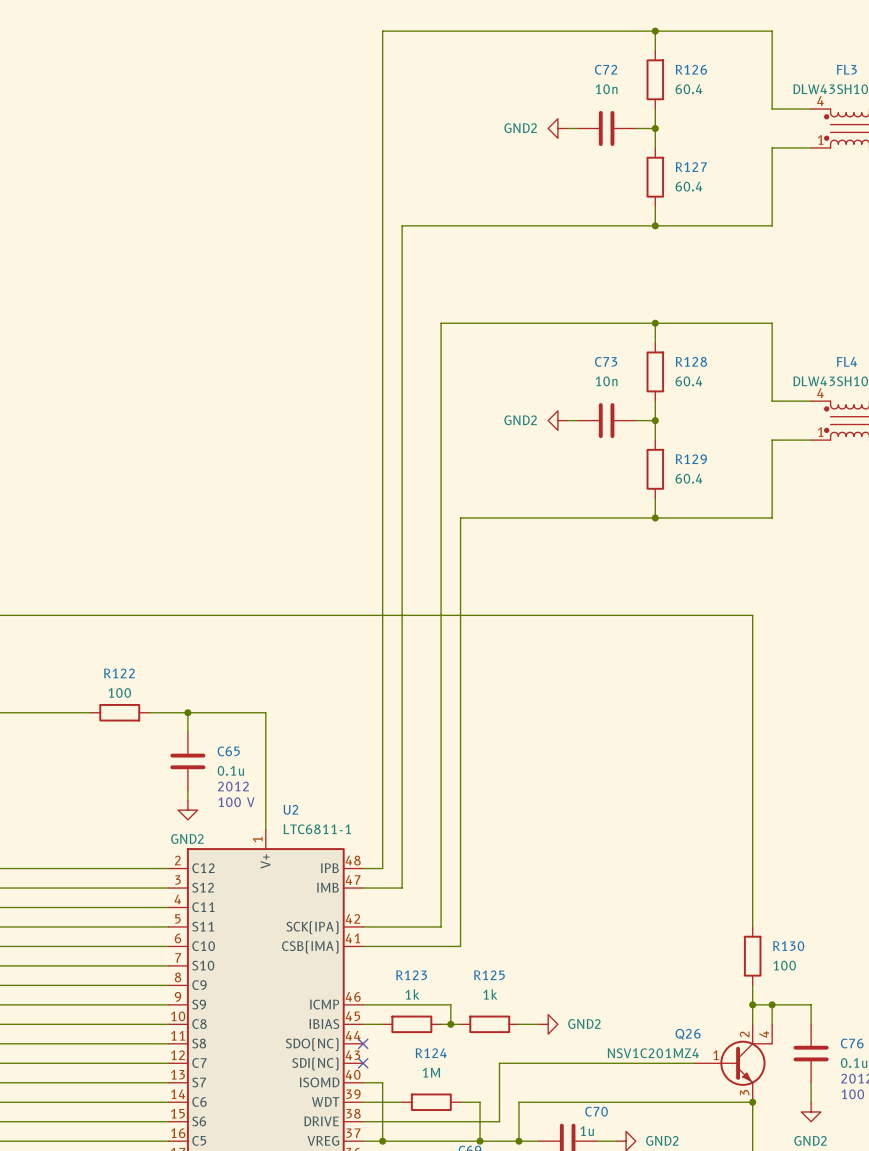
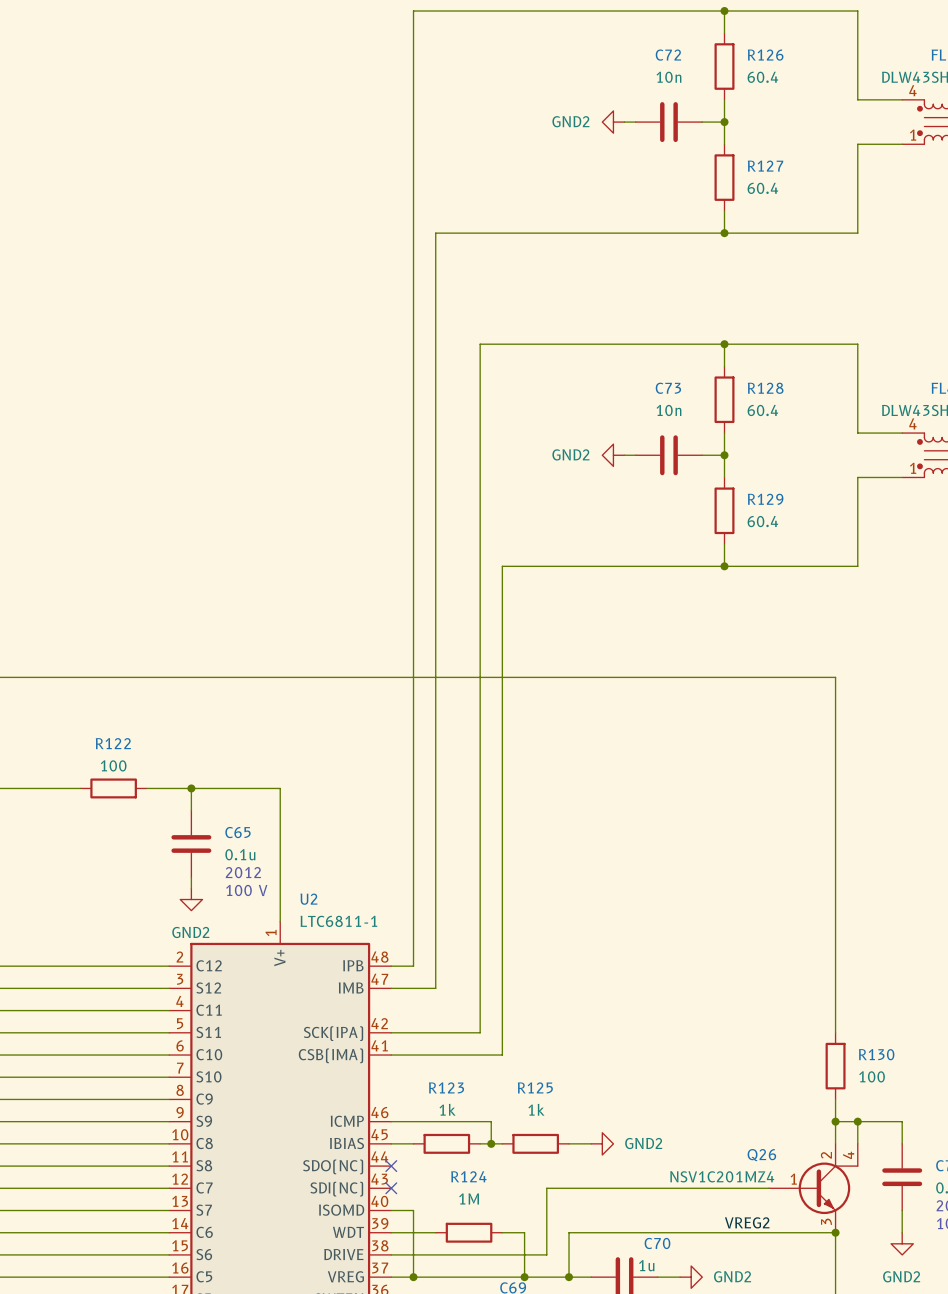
label: none -> VREG2 (747, 1222)

